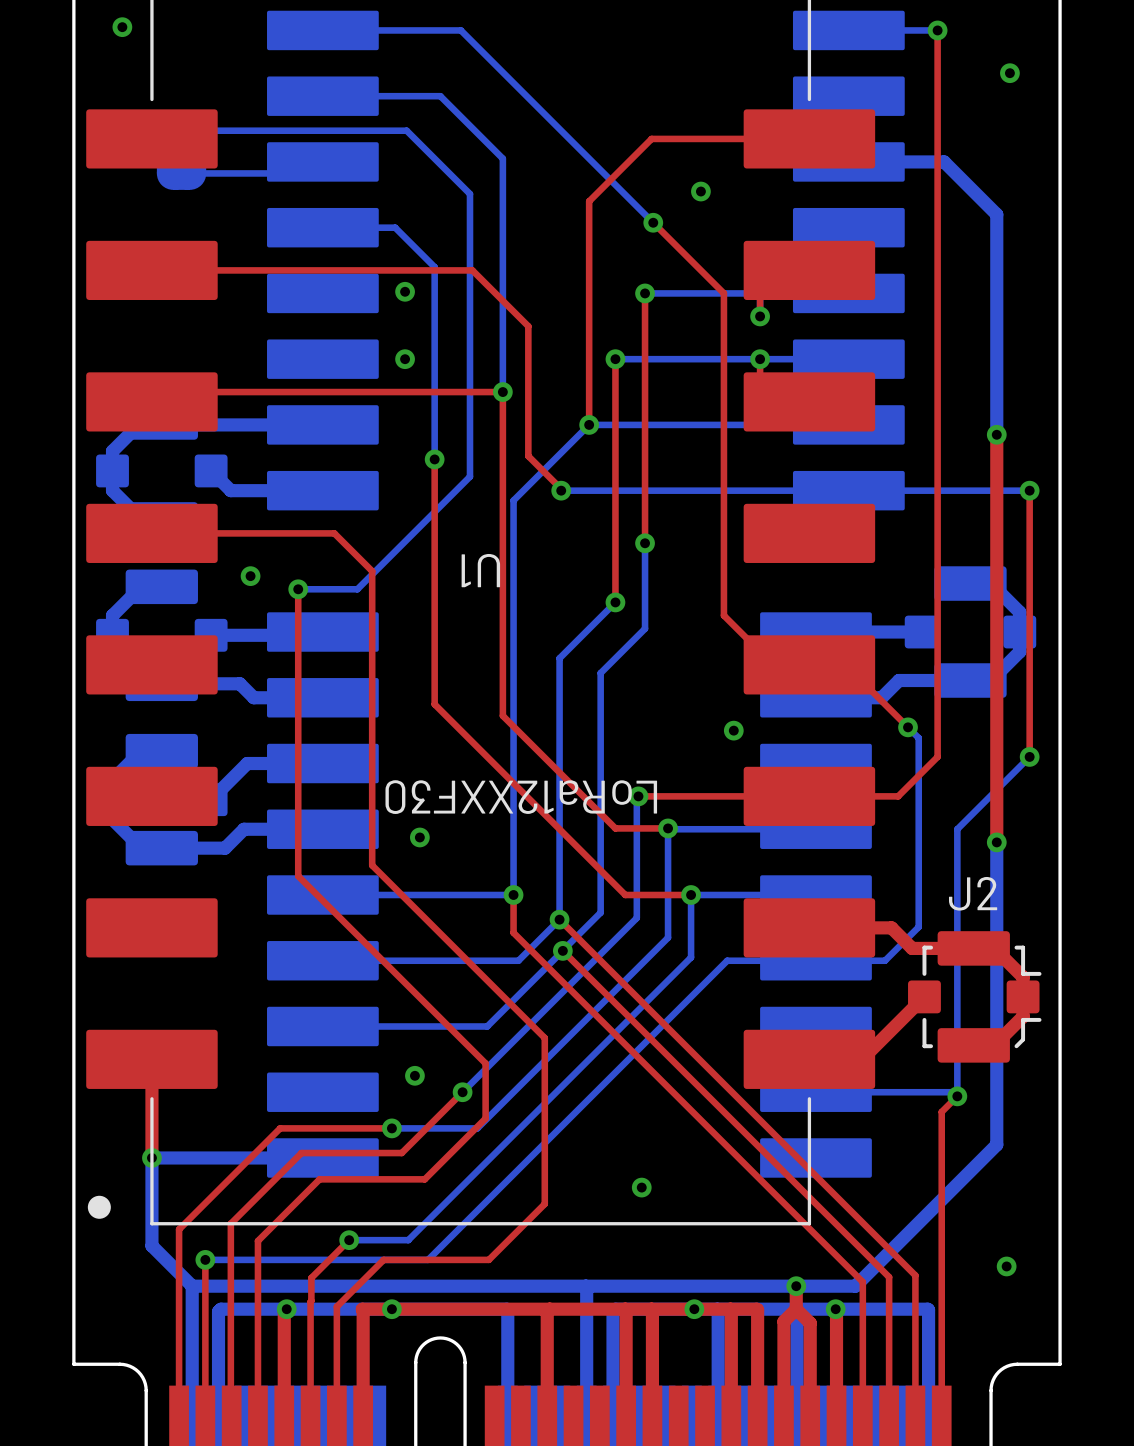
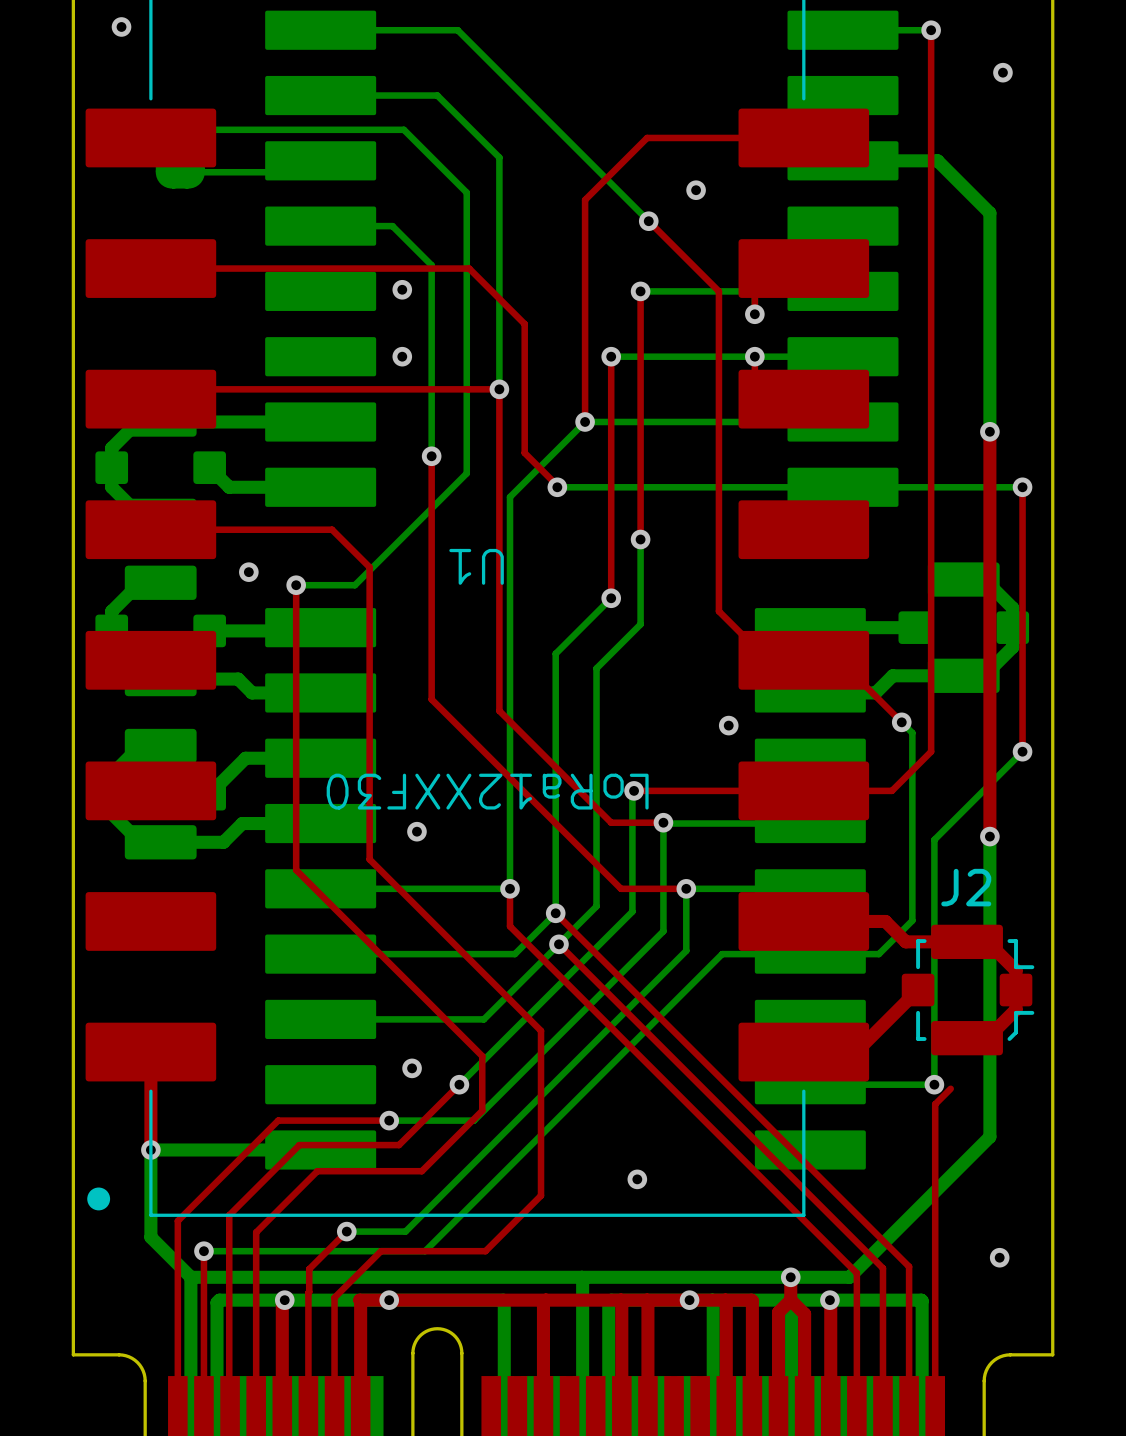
bottom track: (957, 829) (957, 1096) (953, 1092) (940, 1092) -> (950, 823) (934, 839) (934, 1084)
via position: (957, 1096) -> (934, 1084)

